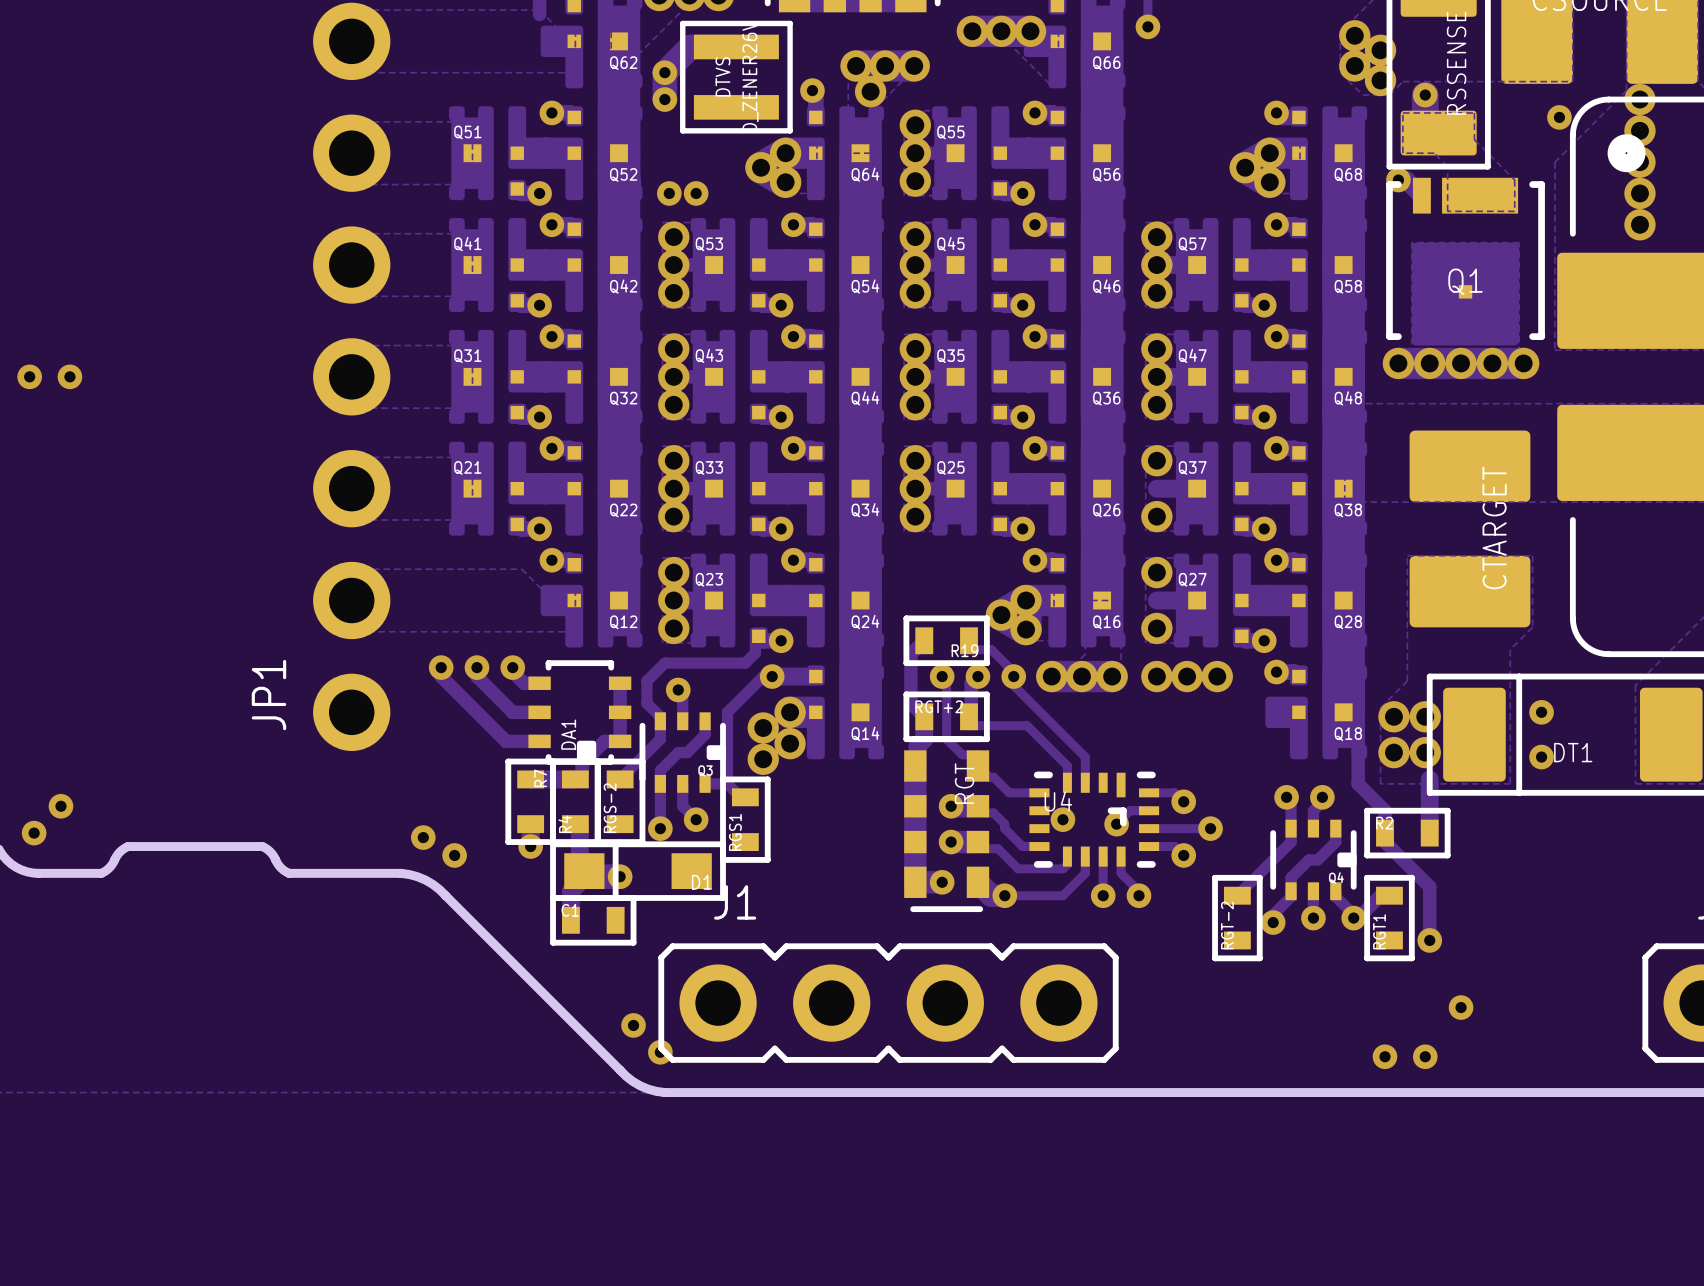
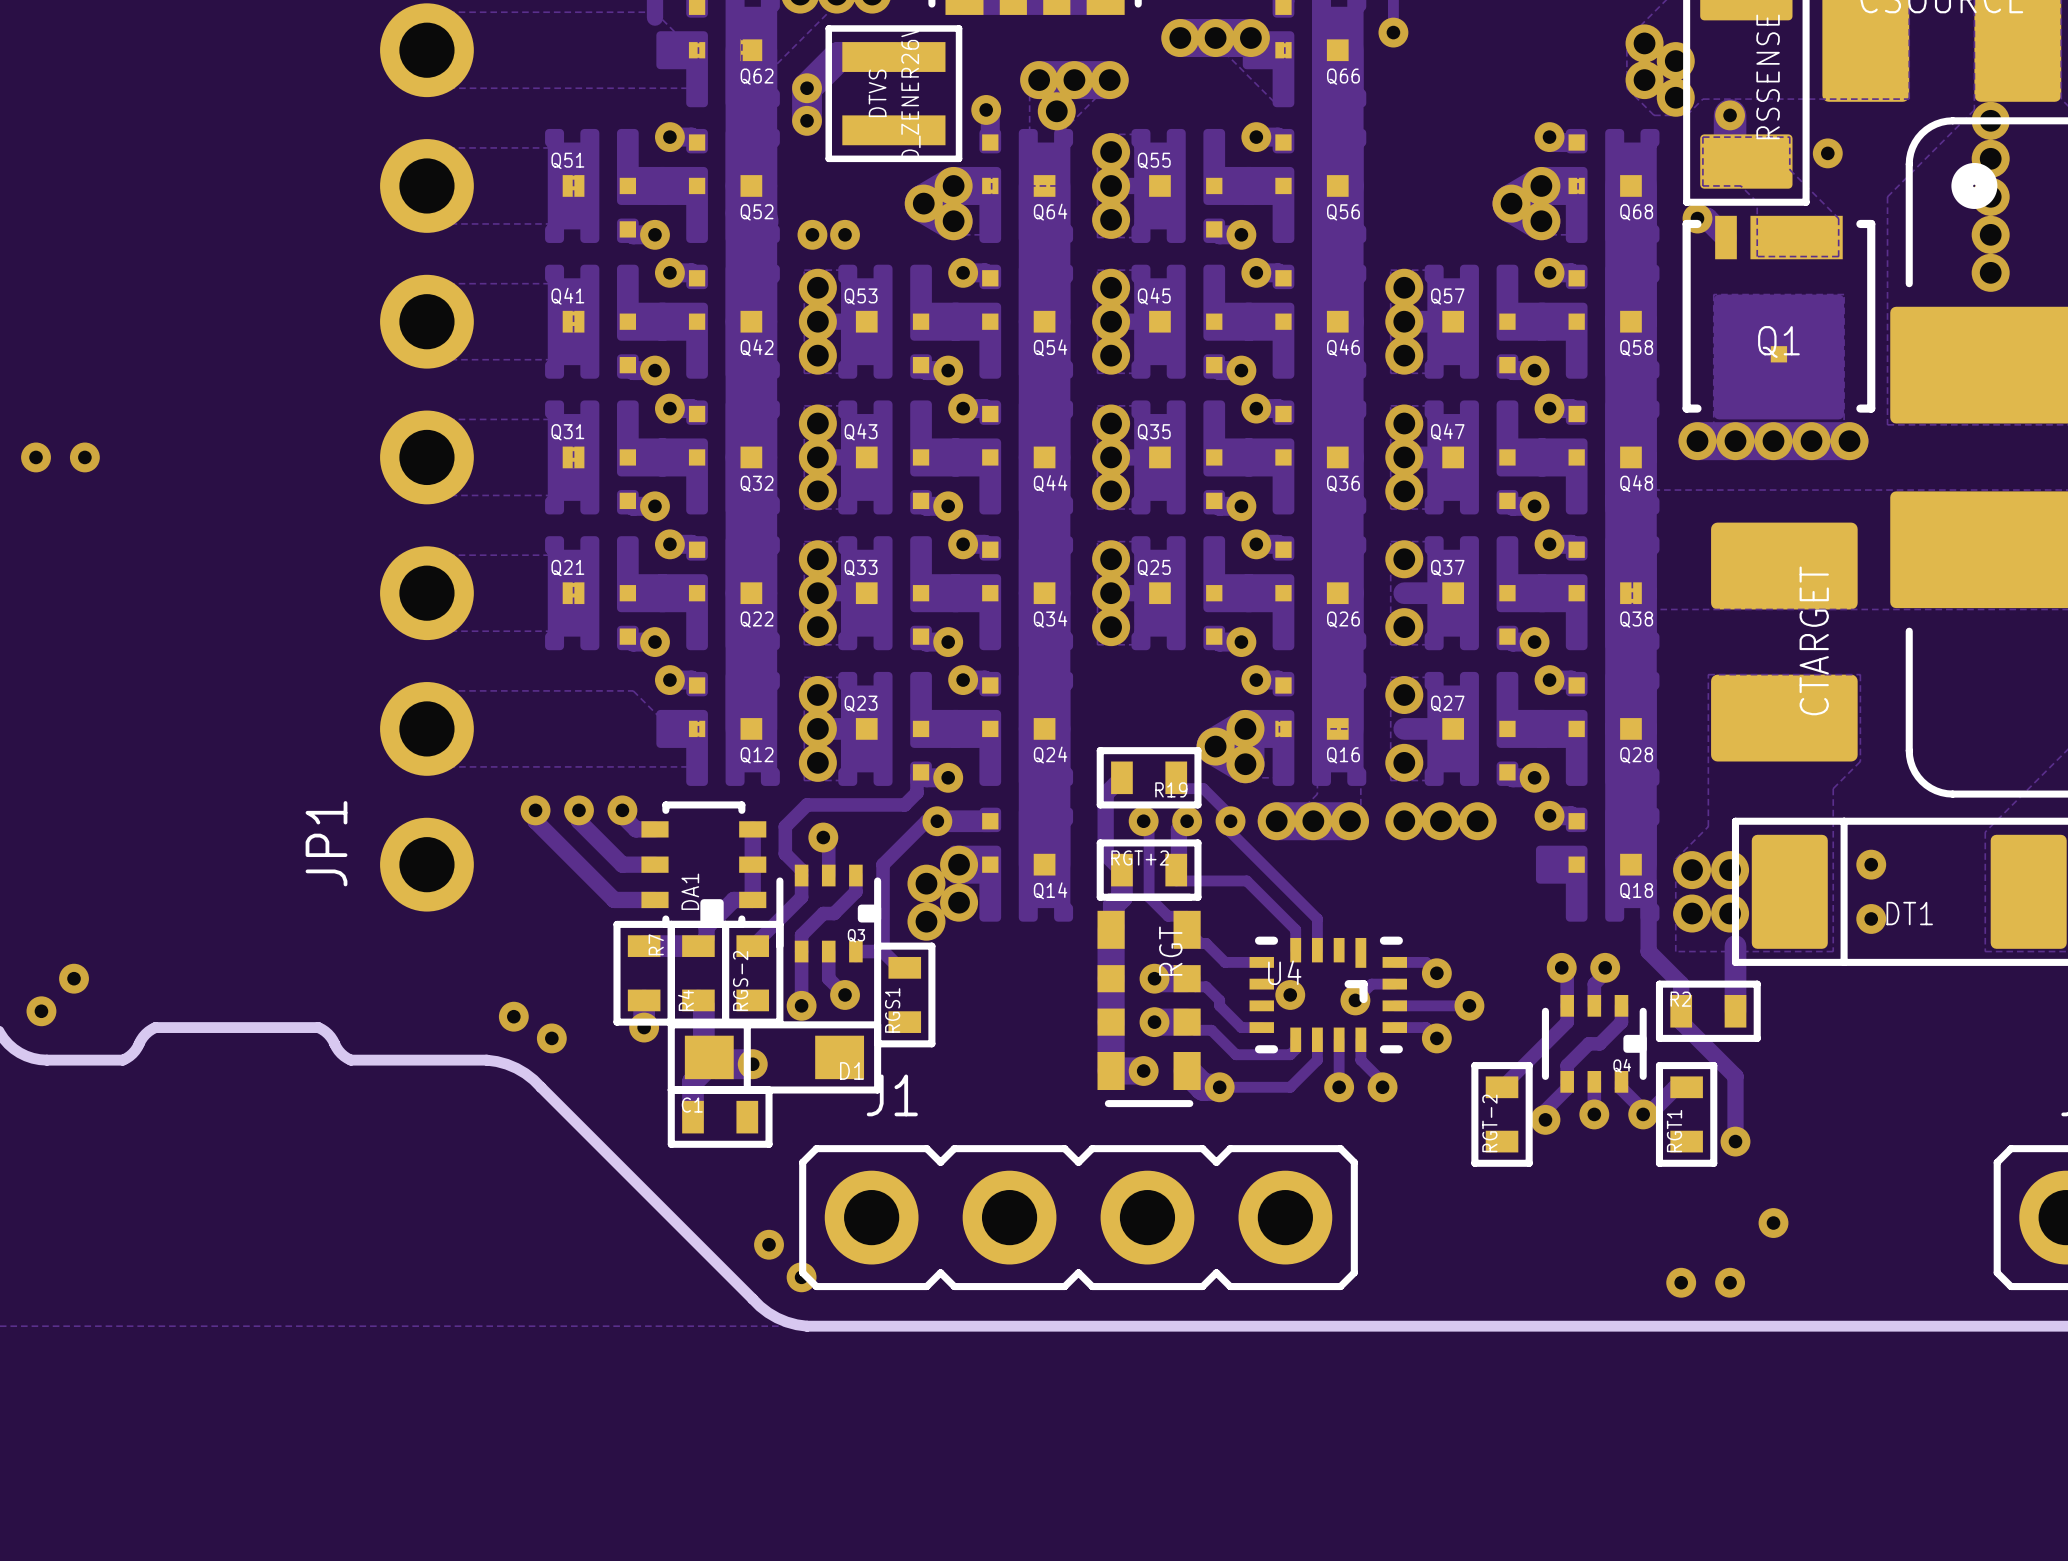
via position: (1559, 117) -> (1827, 153)

